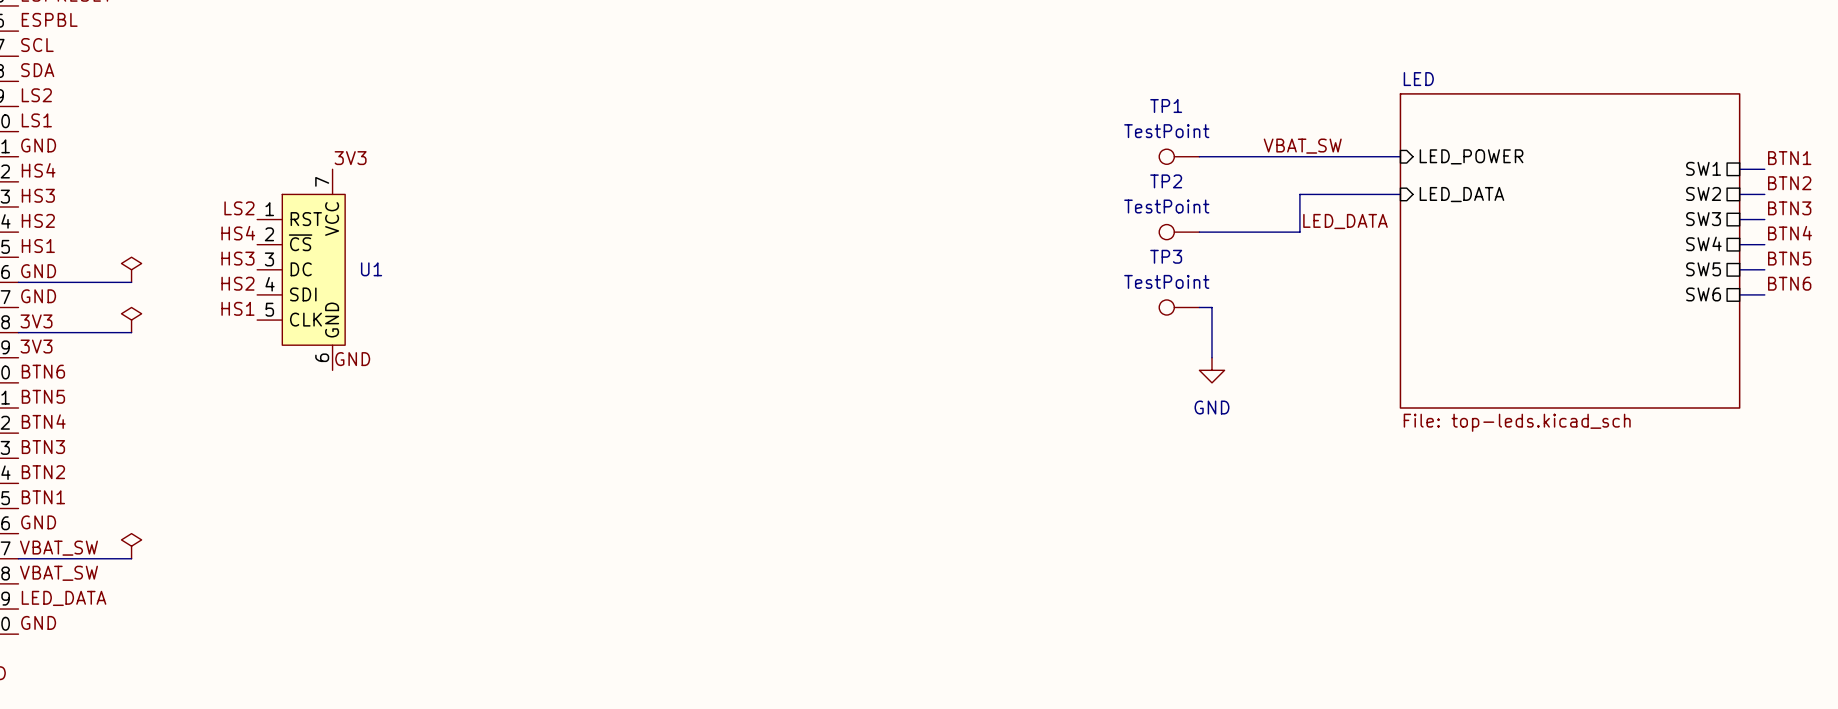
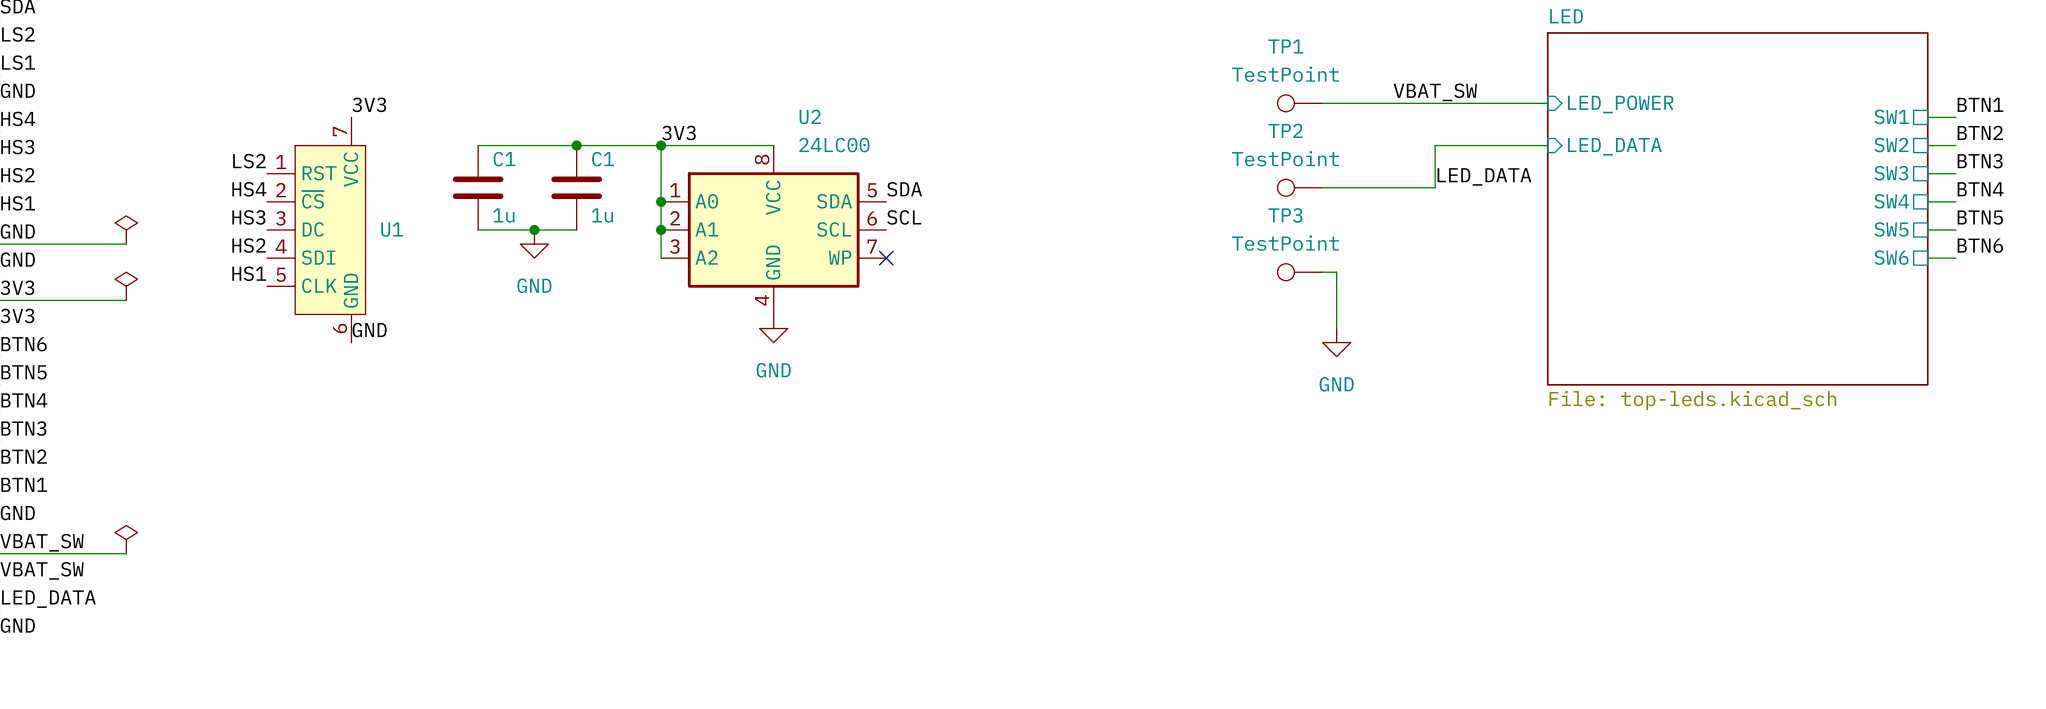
label: none -> 3V3 (678, 133)
wire: none -> (478, 145) (773, 145)
junction: none -> (576, 145)
wire: none -> (661, 145) (661, 258)
junction: none -> (661, 145)
C1: none -> 1u (478, 187)
C1: none -> 1u (576, 187)
label: none -> SDA (904, 189)
junction: none -> (661, 201)
label: none -> SCL (904, 217)
wire: none -> (478, 230) (576, 230)
junction: none -> (534, 230)
junction: none -> (661, 230)
U2: none -> 24LC00 (773, 230)
power symbol: none -> GND (534, 244)
no-connect mark: none -> (886, 258)
power symbol: none -> GND (773, 328)

